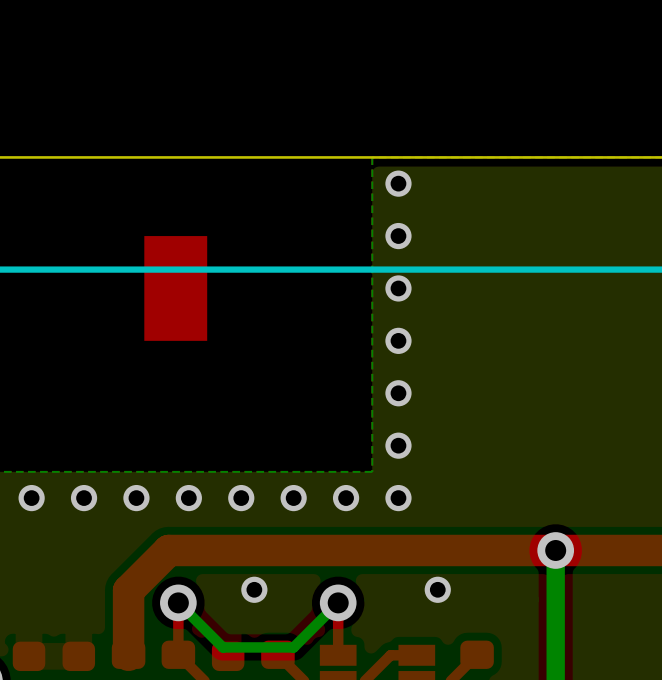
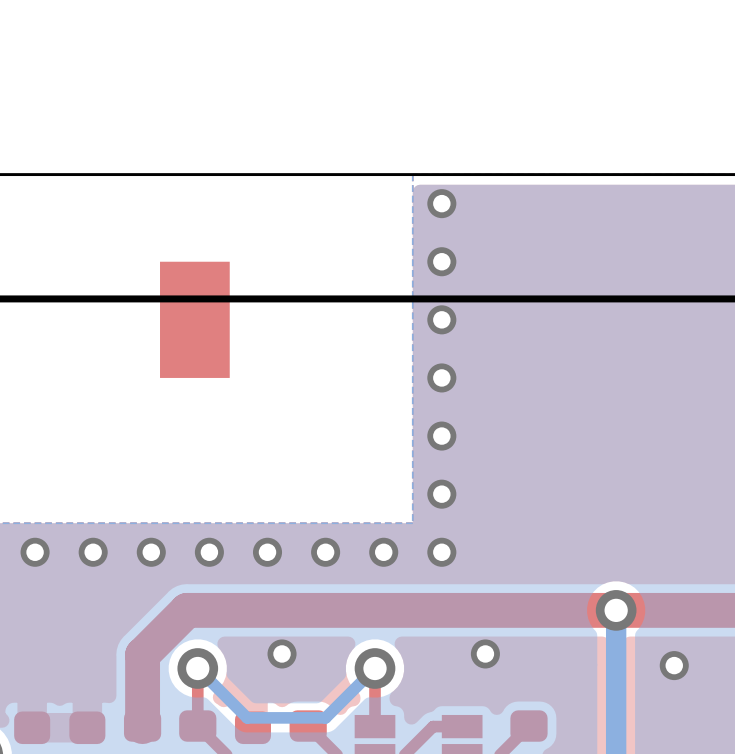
via: none -> (674, 665)

